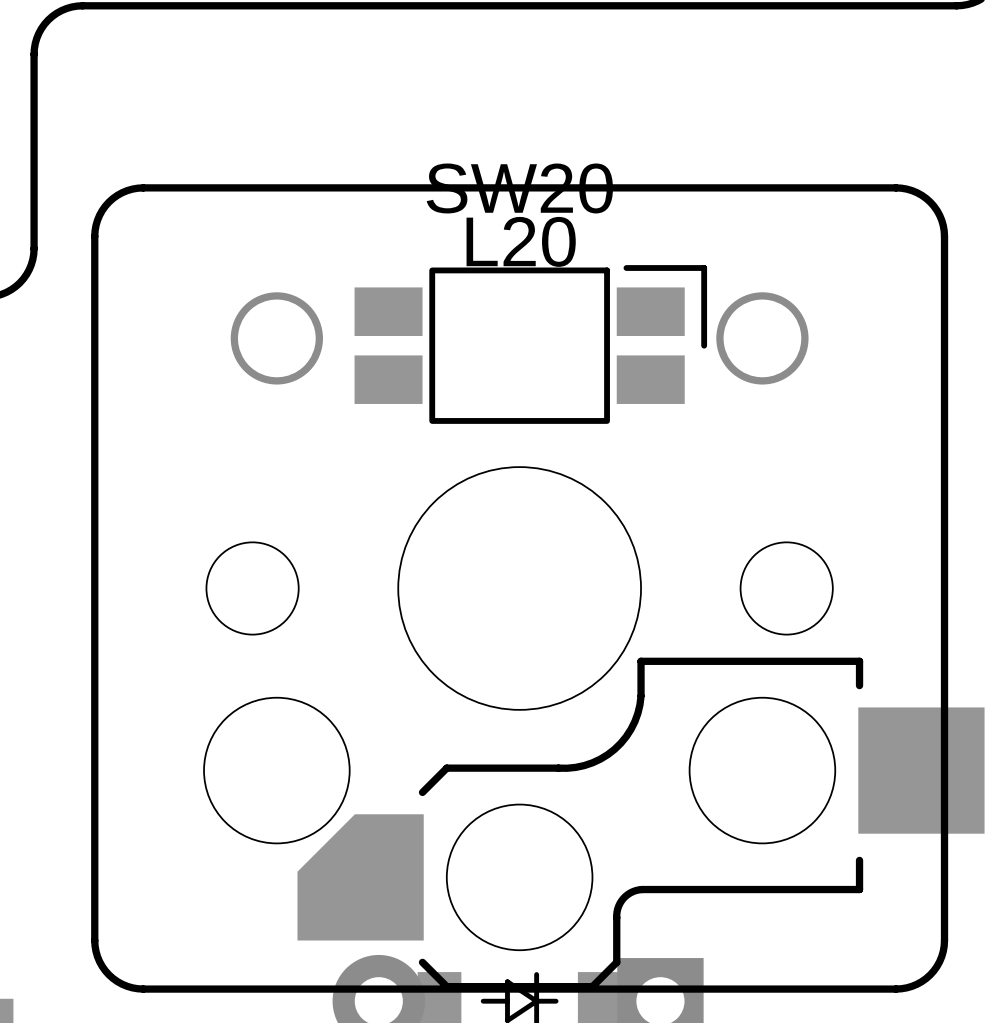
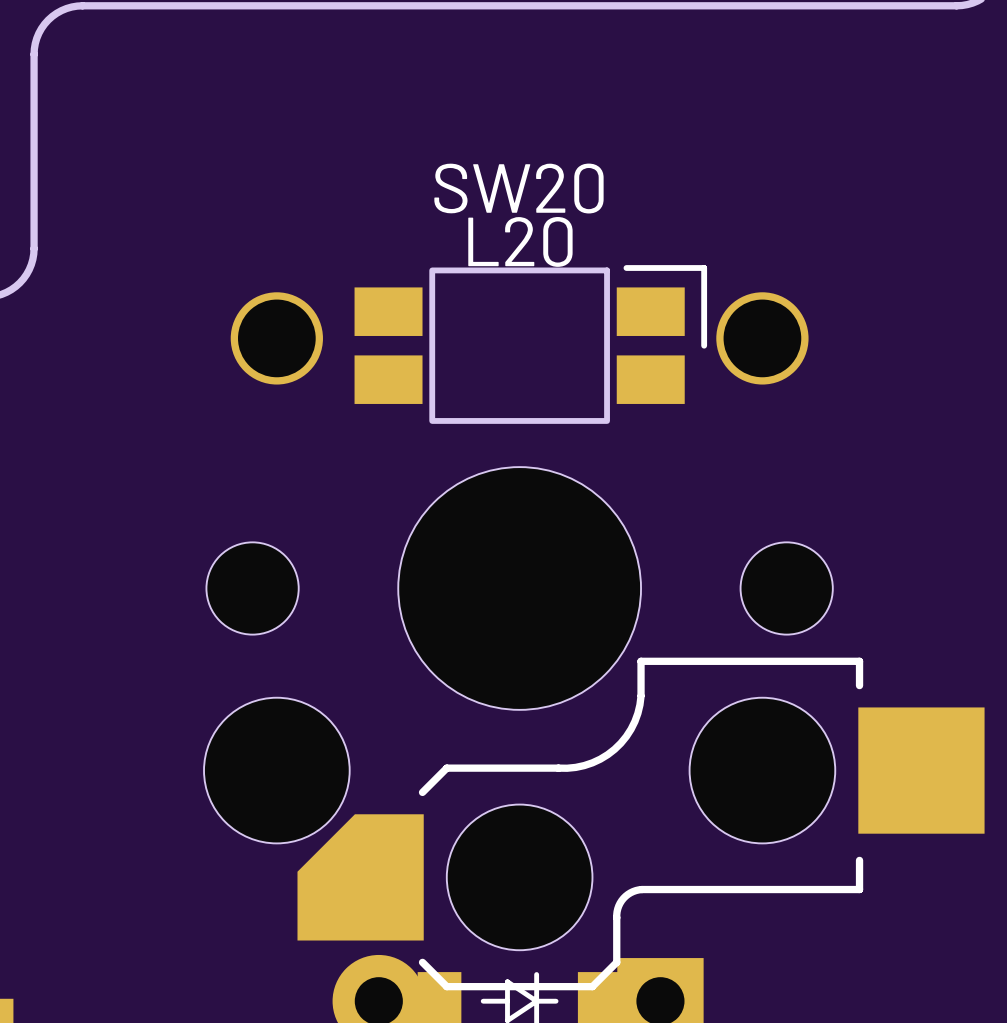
line: (895, 187) (143, 187) (127, 190) (108, 202) (97, 220) (94, 236) (94, 940) (97, 956) (108, 974) (122, 984) (143, 989) (895, 989) (917, 984) (930, 974) (941, 956) (944, 940) (944, 236) (941, 220) (930, 202) (911, 190) (895, 187) -> none

